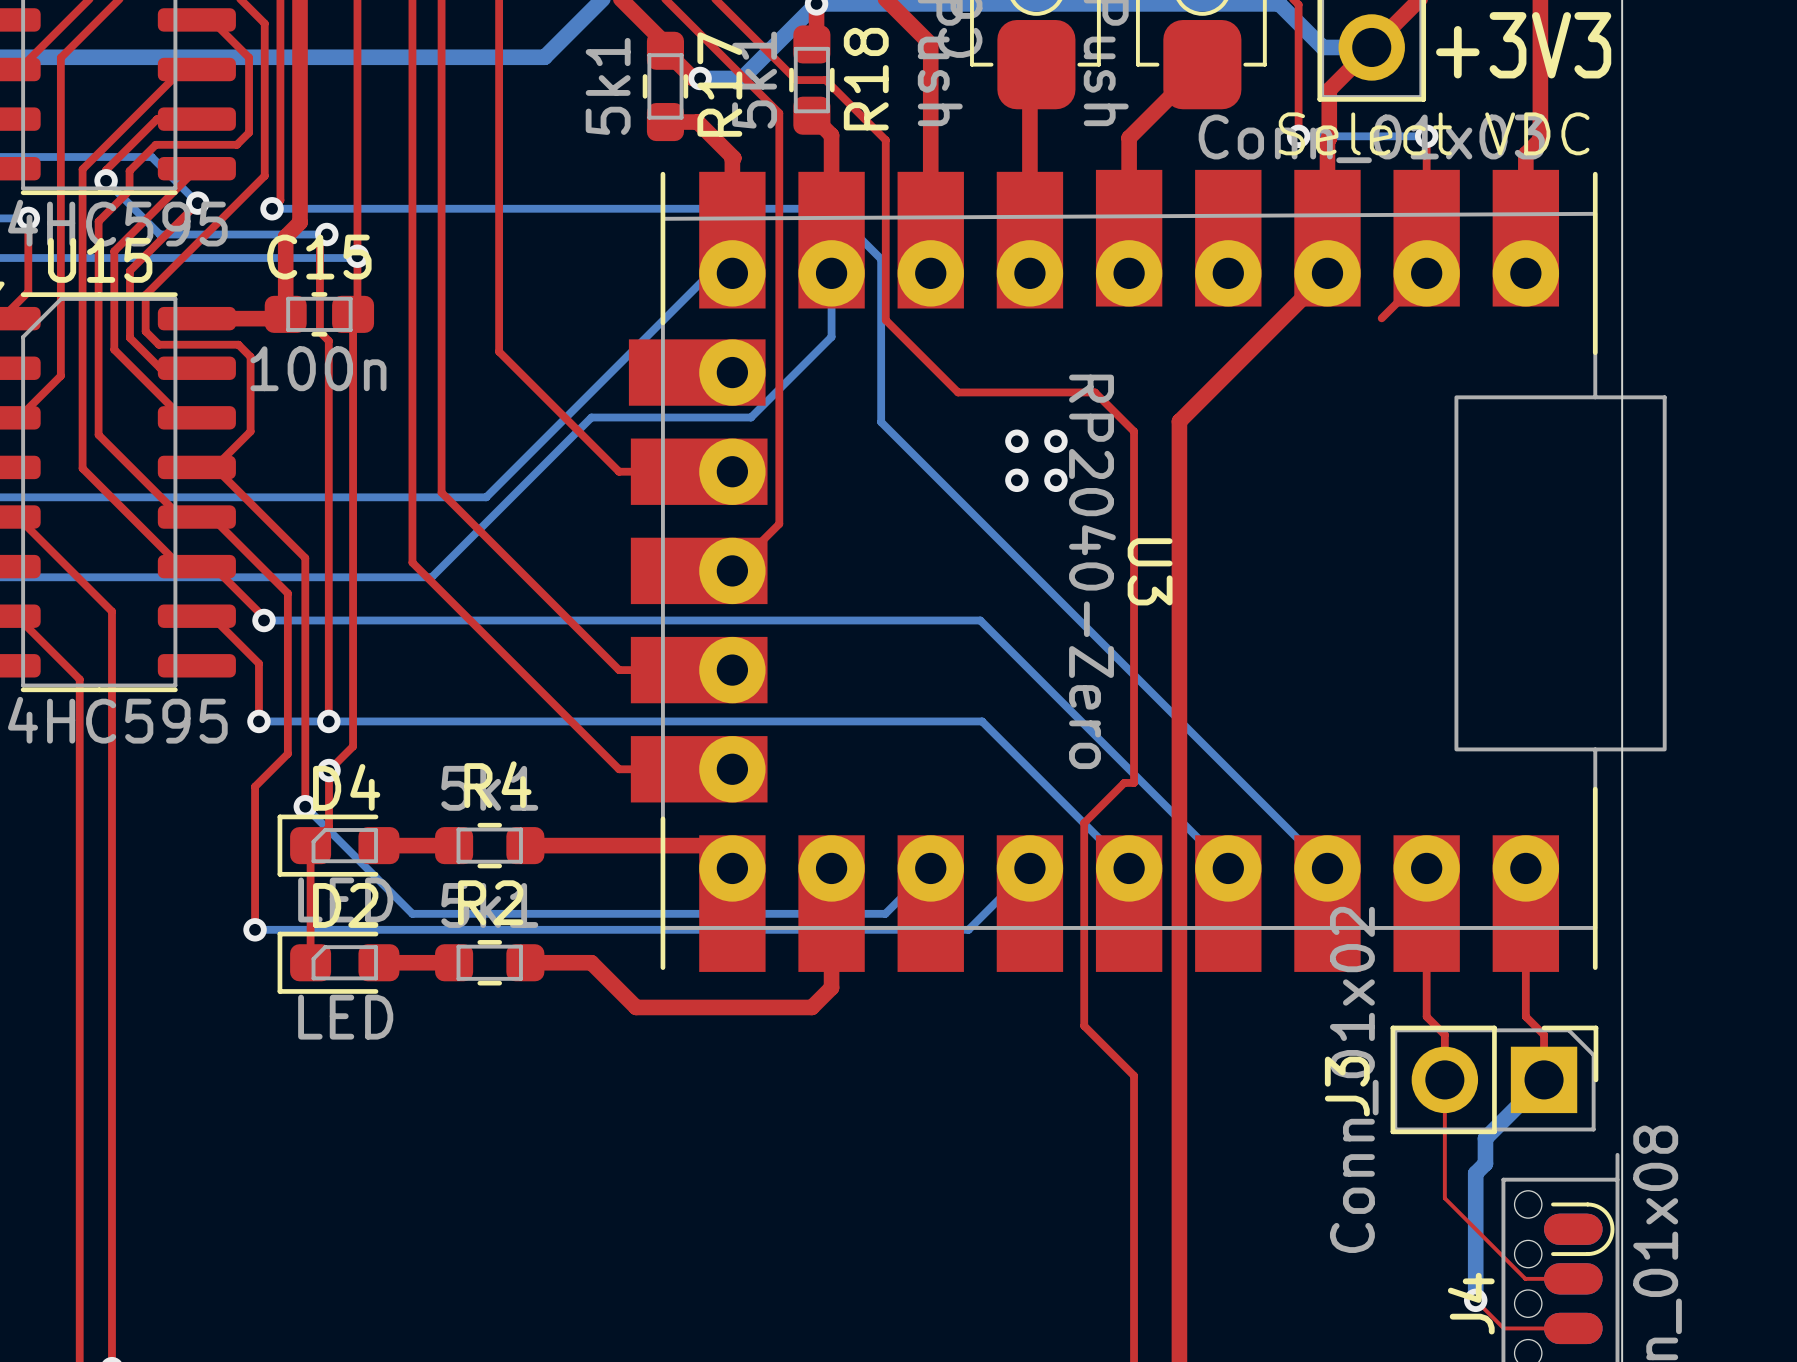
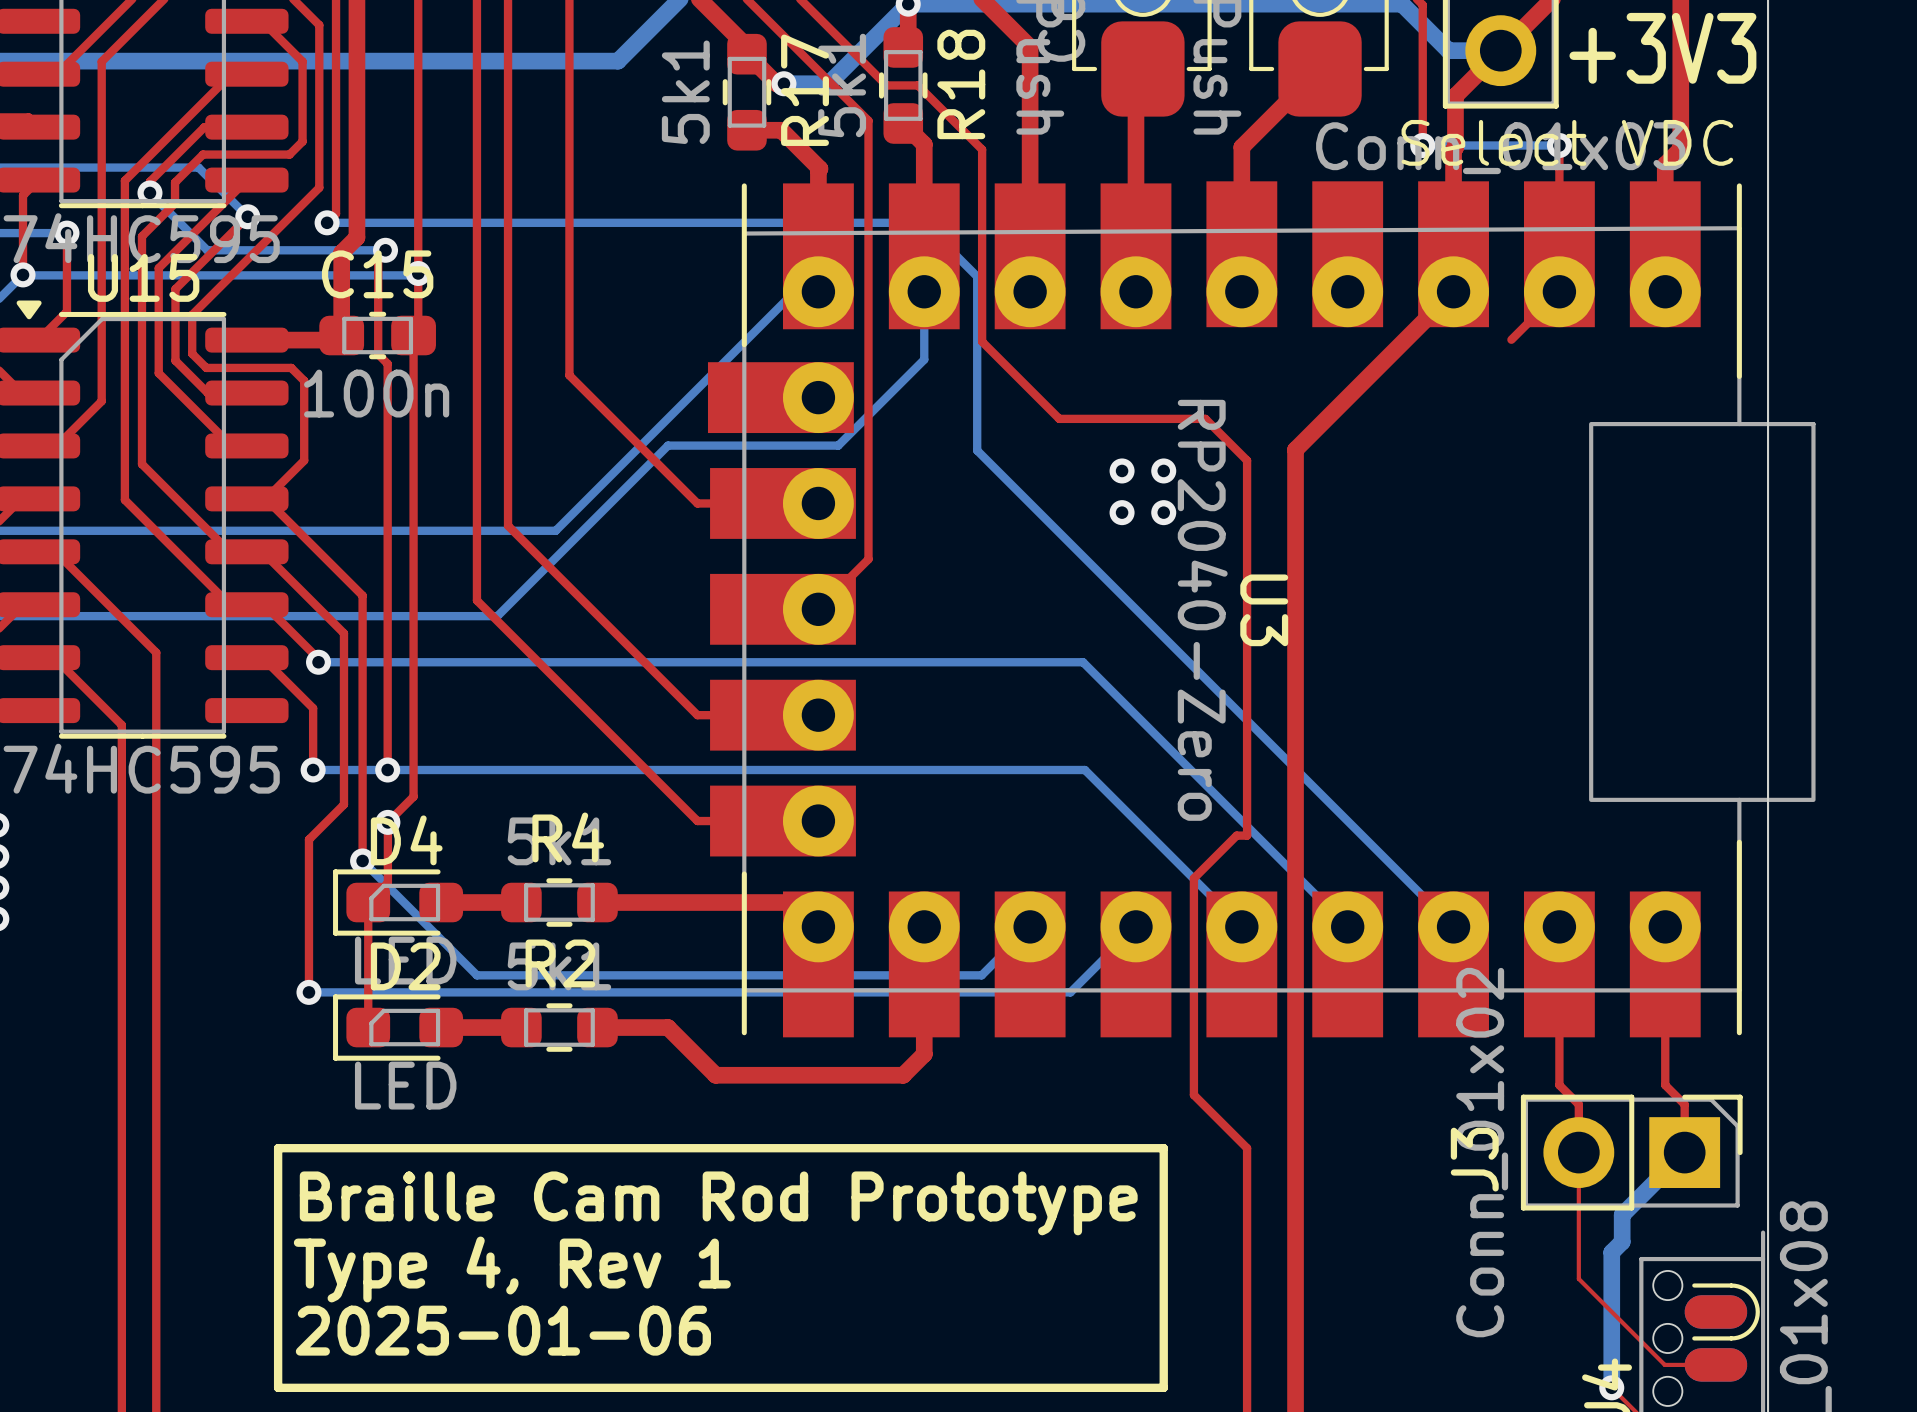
line: none -> (278, 1148) (1163, 1148) (1163, 1387) (278, 1387) (278, 1148)
text: none -> Braille Cam Rod Prototype (718, 1203)
text: none -> Type 4, Rev 1 (512, 1269)
text: none -> 2025-01-06 (503, 1330)

